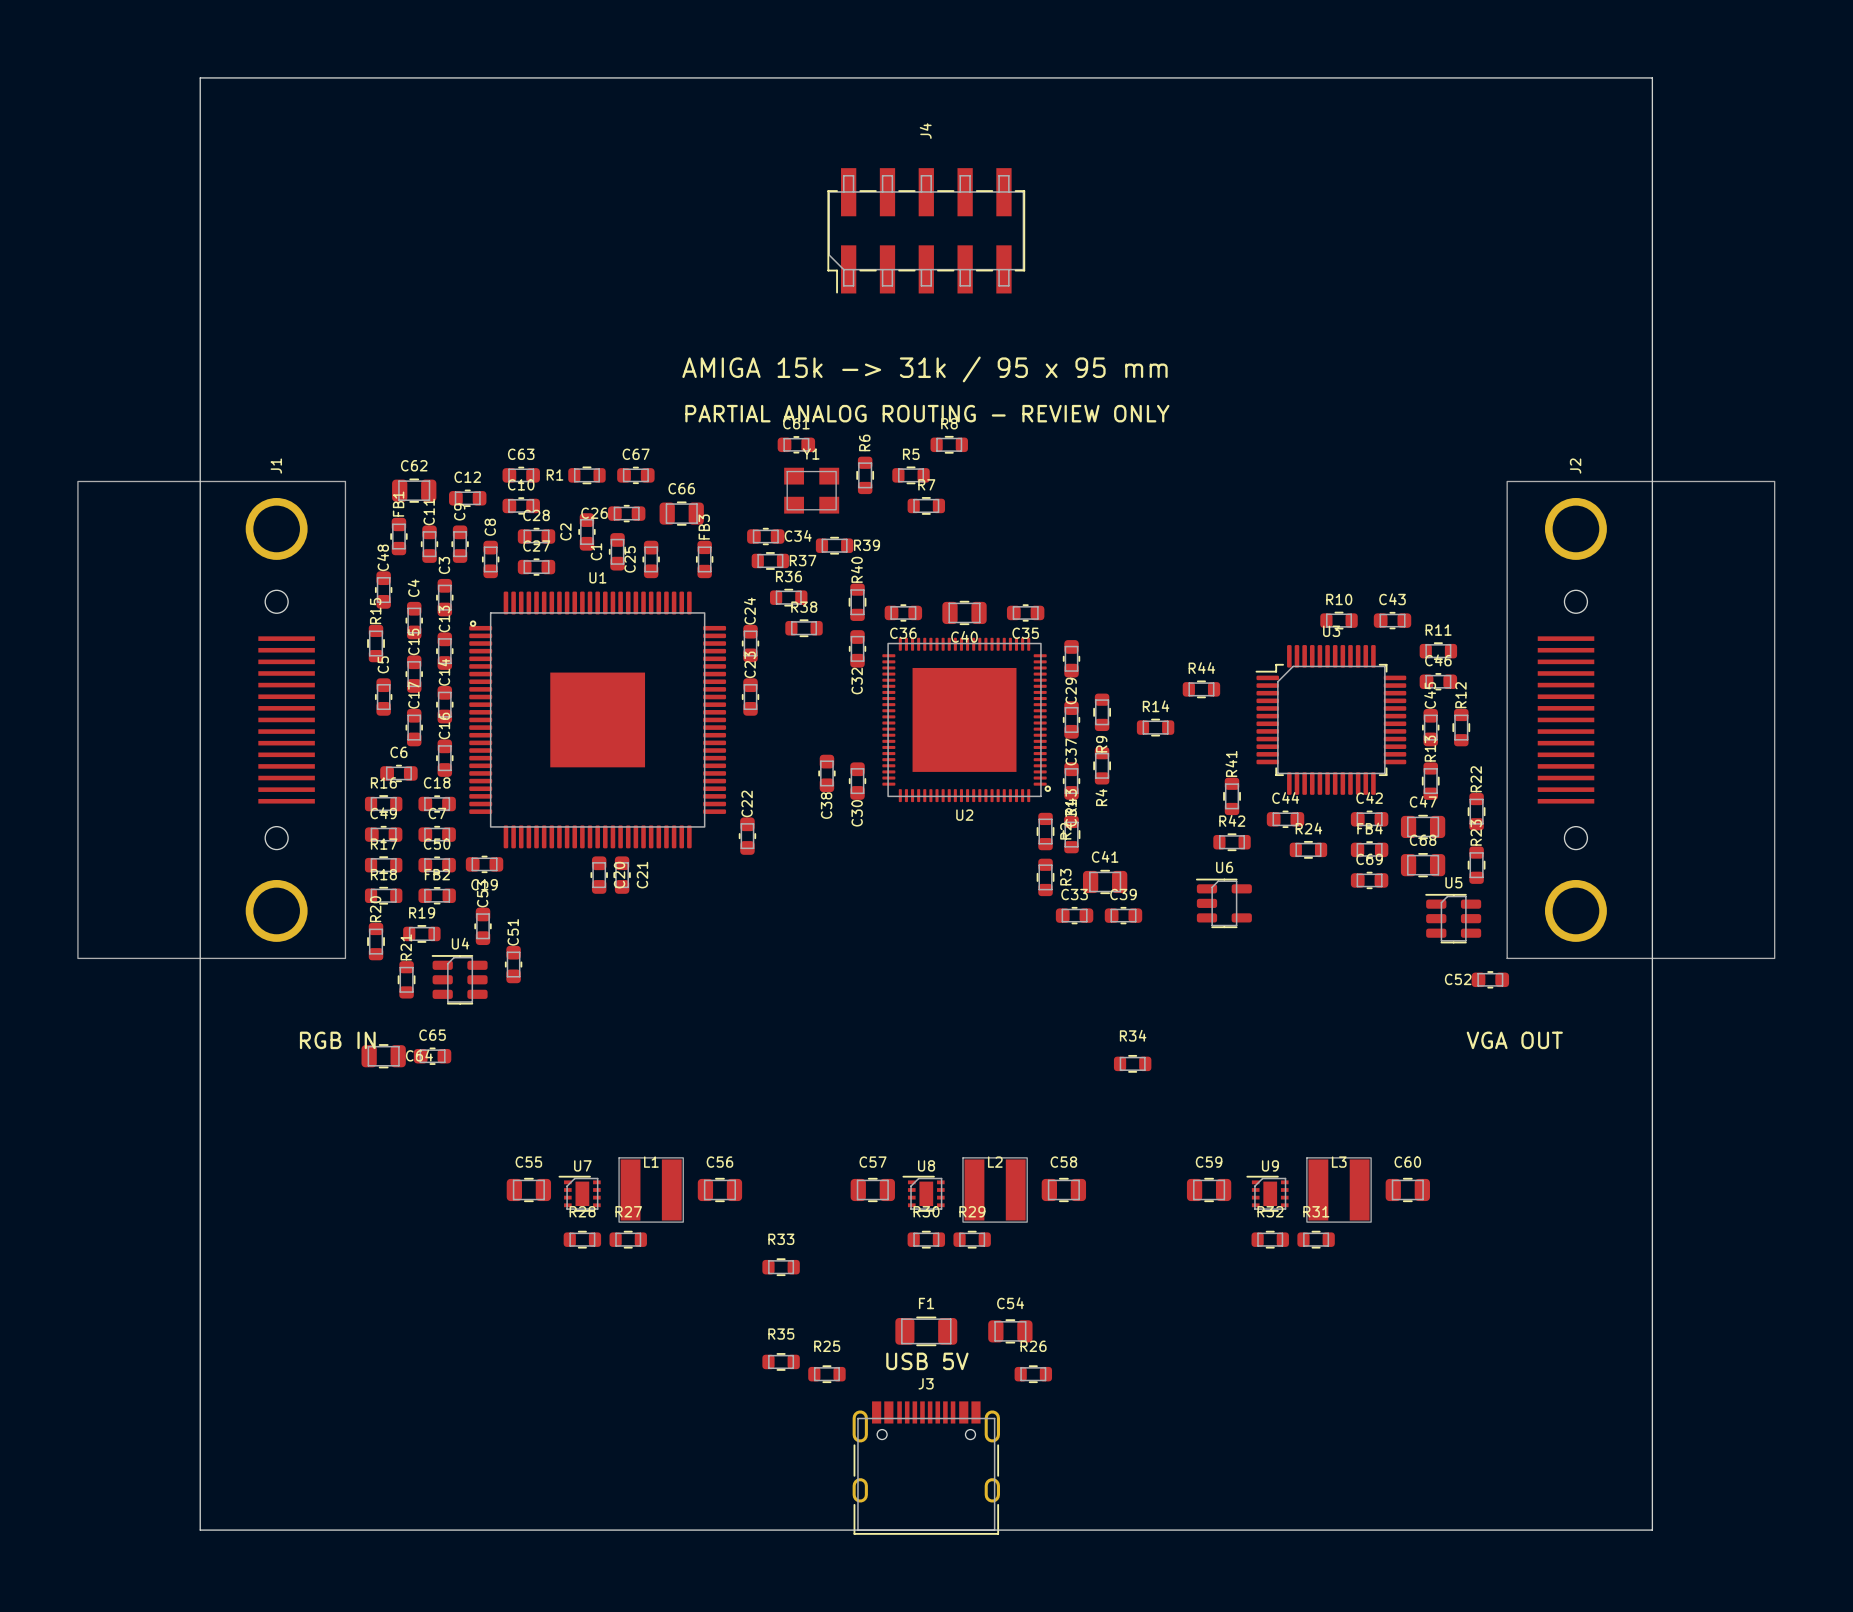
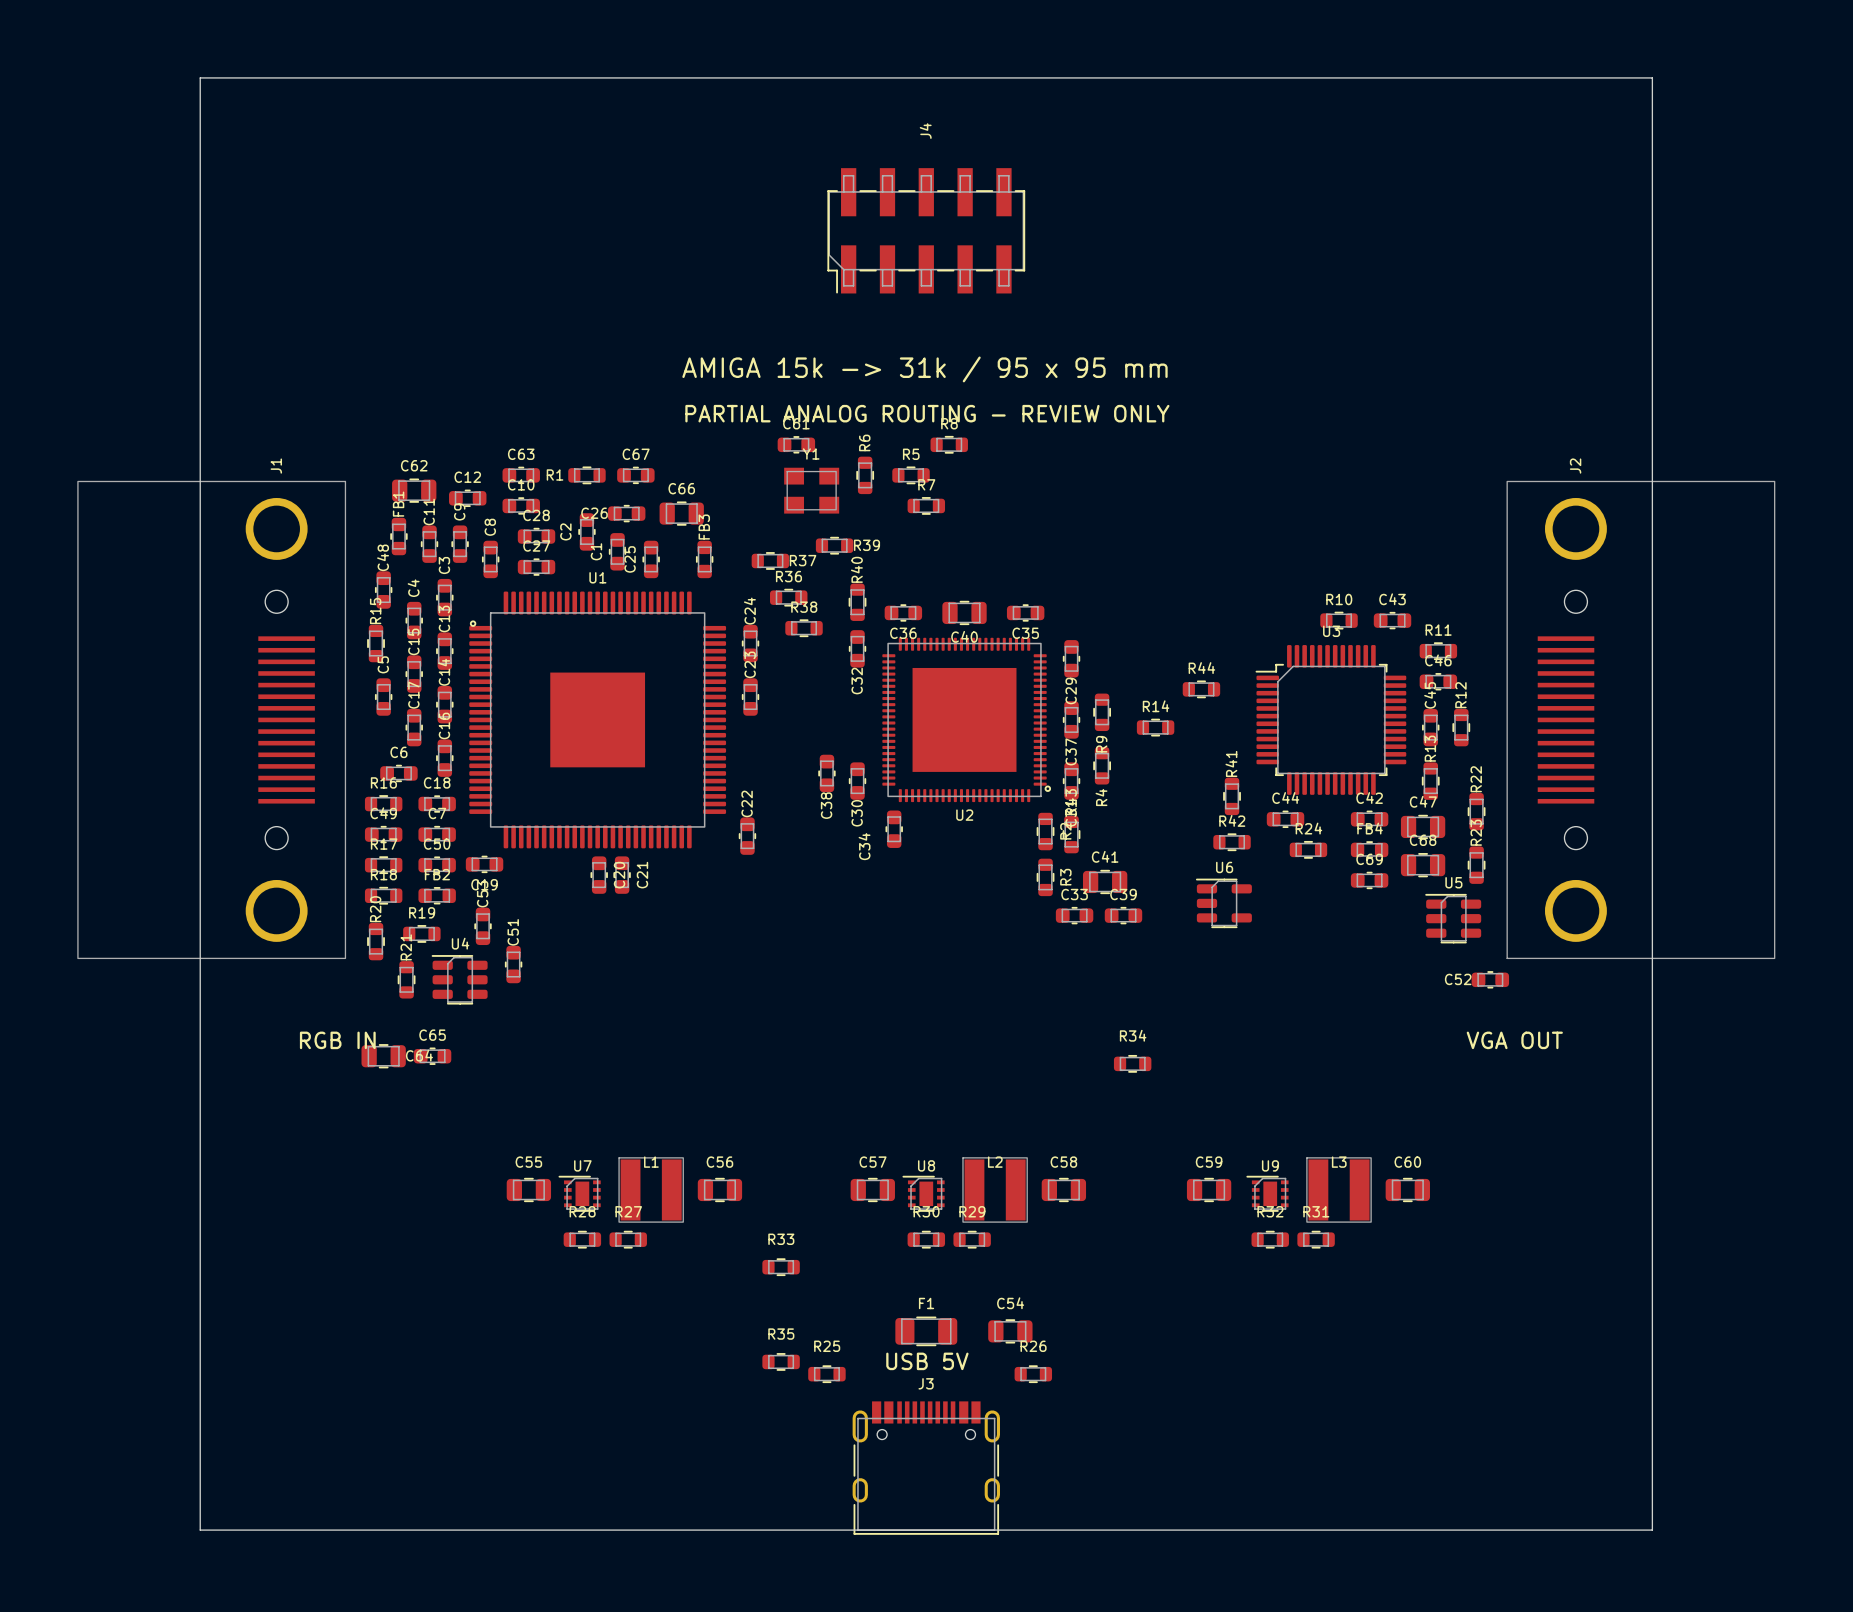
C34 name position: C34 (798, 535) -> C34 (864, 846)
C34 rotation: 0° (765, 536) -> 90° clockwise (894, 829)
C34 position: (765, 536) -> (894, 829)

